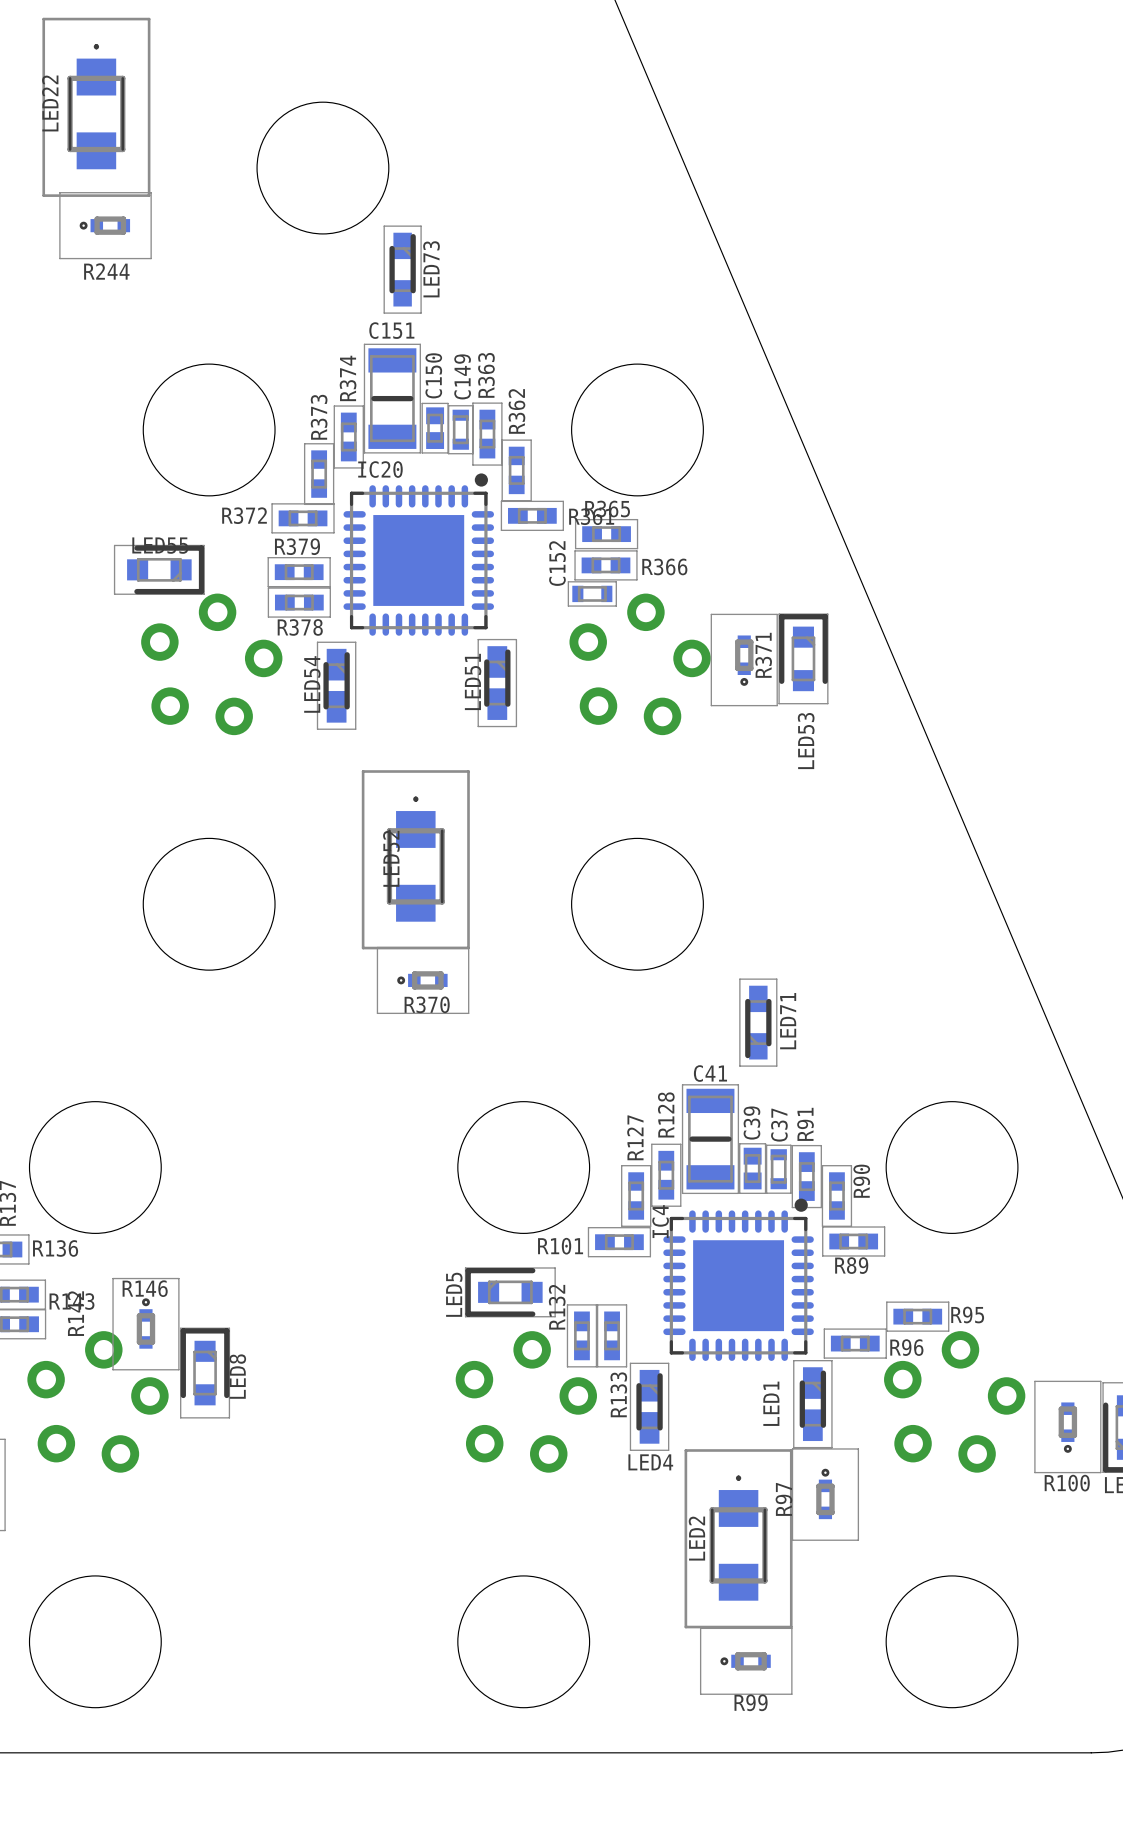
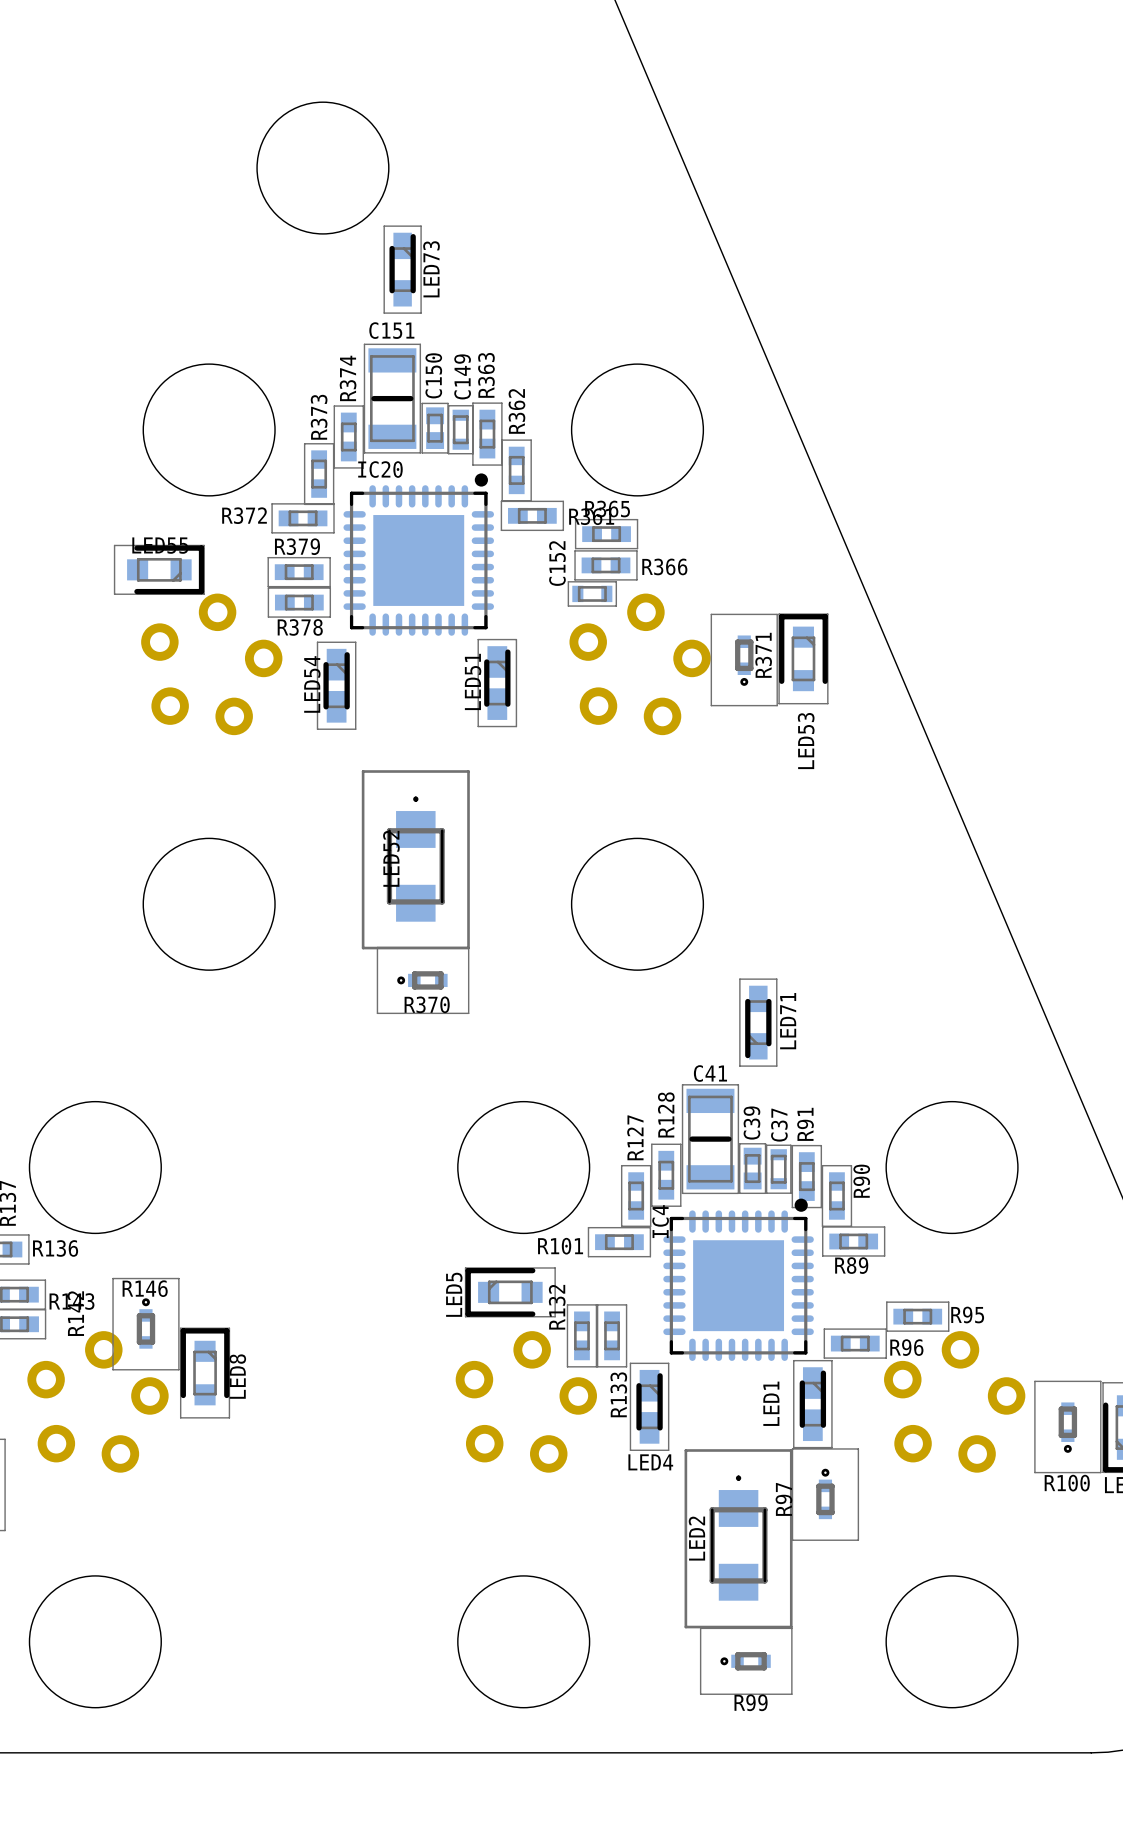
LED22: (96, 107) -> none
R244: (105, 225) -> none

